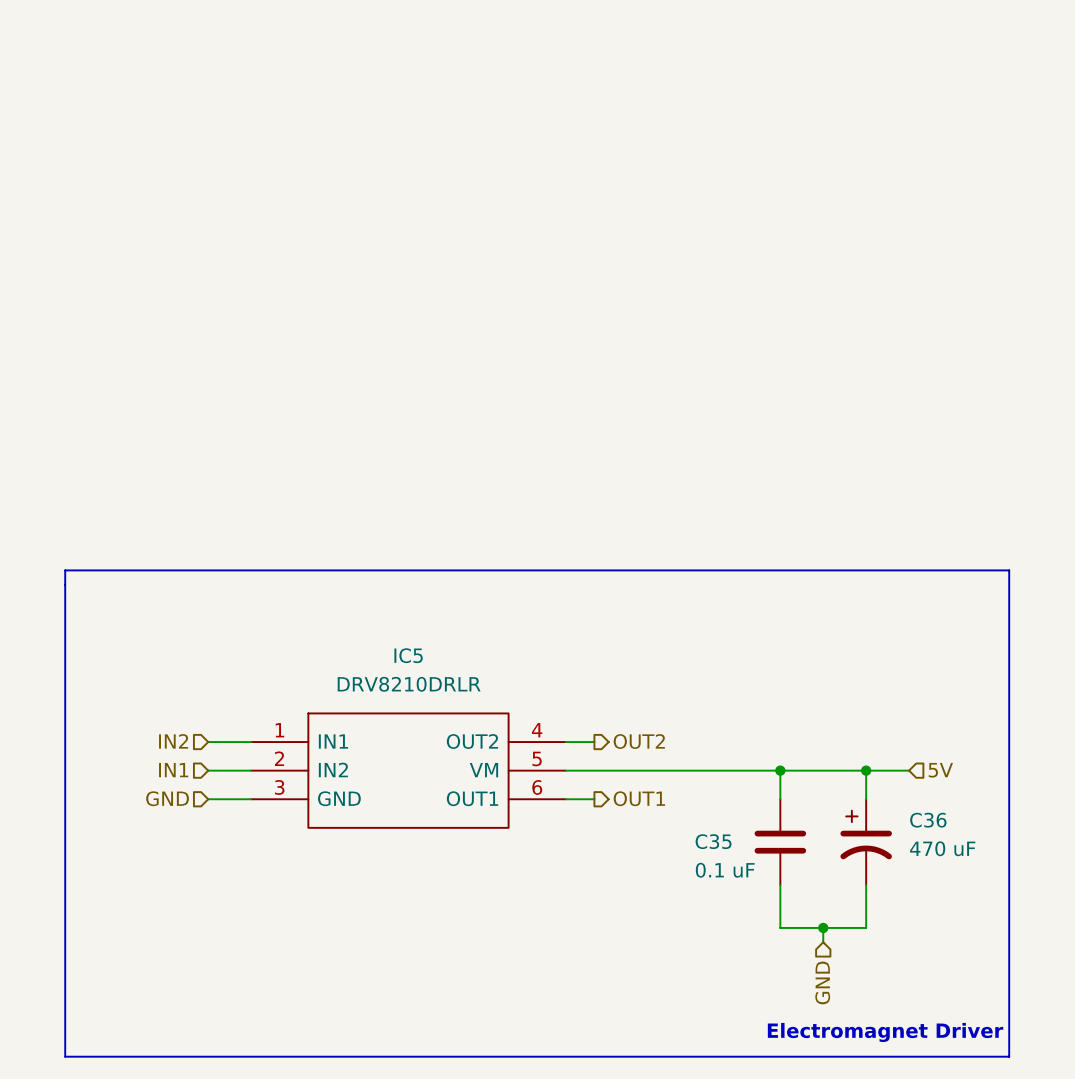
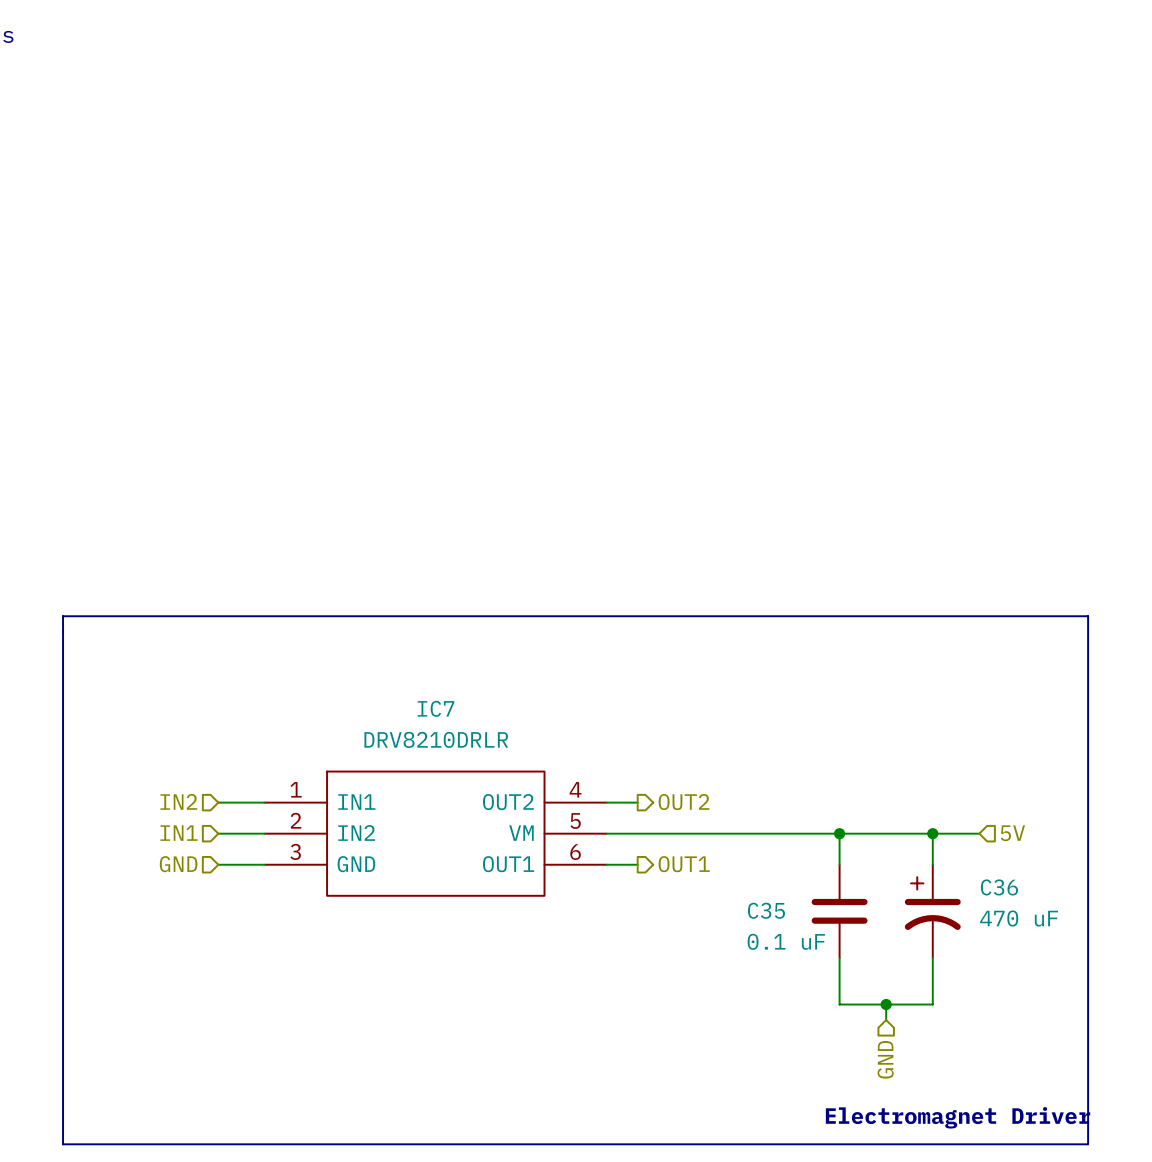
IC5 name: IC5 (408, 655) -> IC7 (435, 708)

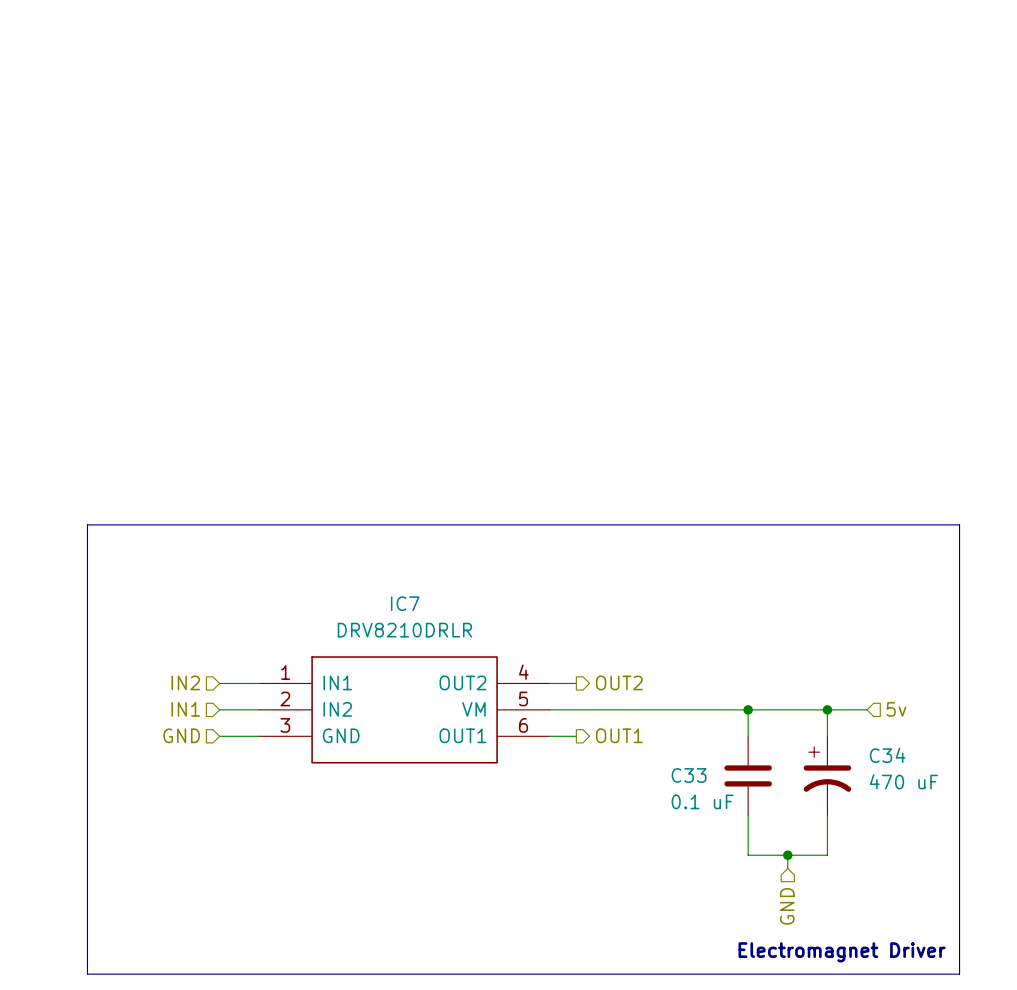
hierarchical label: 5V (1012, 833) -> 5v (896, 709)
C36 name: C36 (999, 887) -> C34 (887, 755)
C35 name: C35 (766, 910) -> C33 (689, 775)

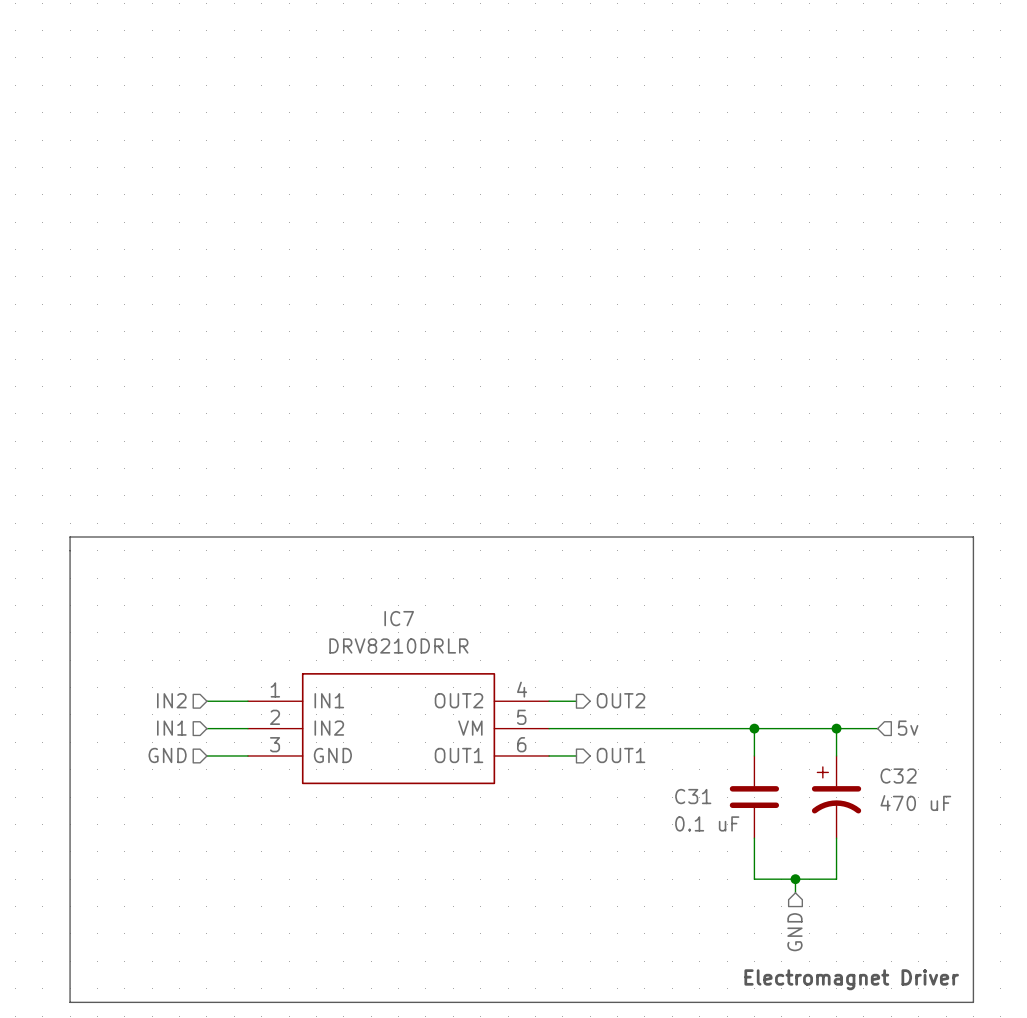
C34 name: C34 (887, 755) -> C32 (898, 776)
C33 name: C33 (689, 775) -> C31 (693, 796)

